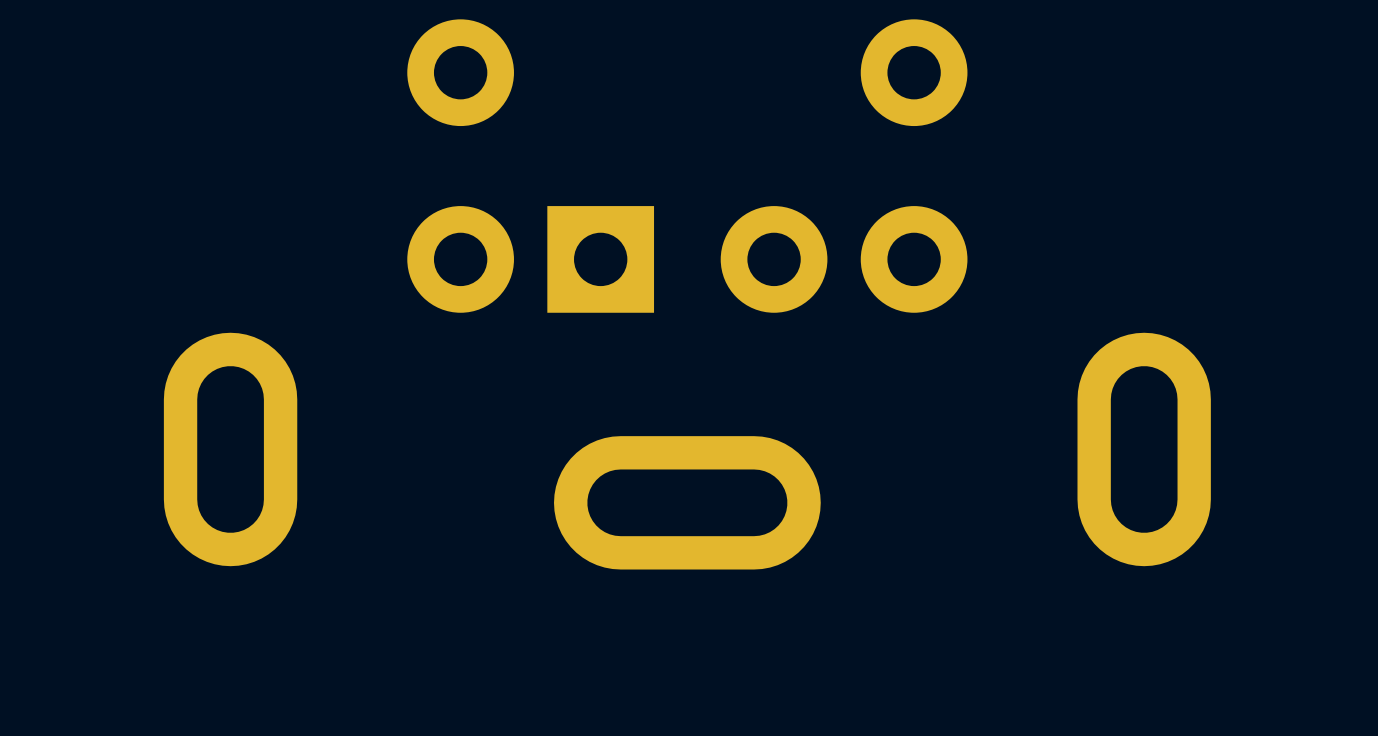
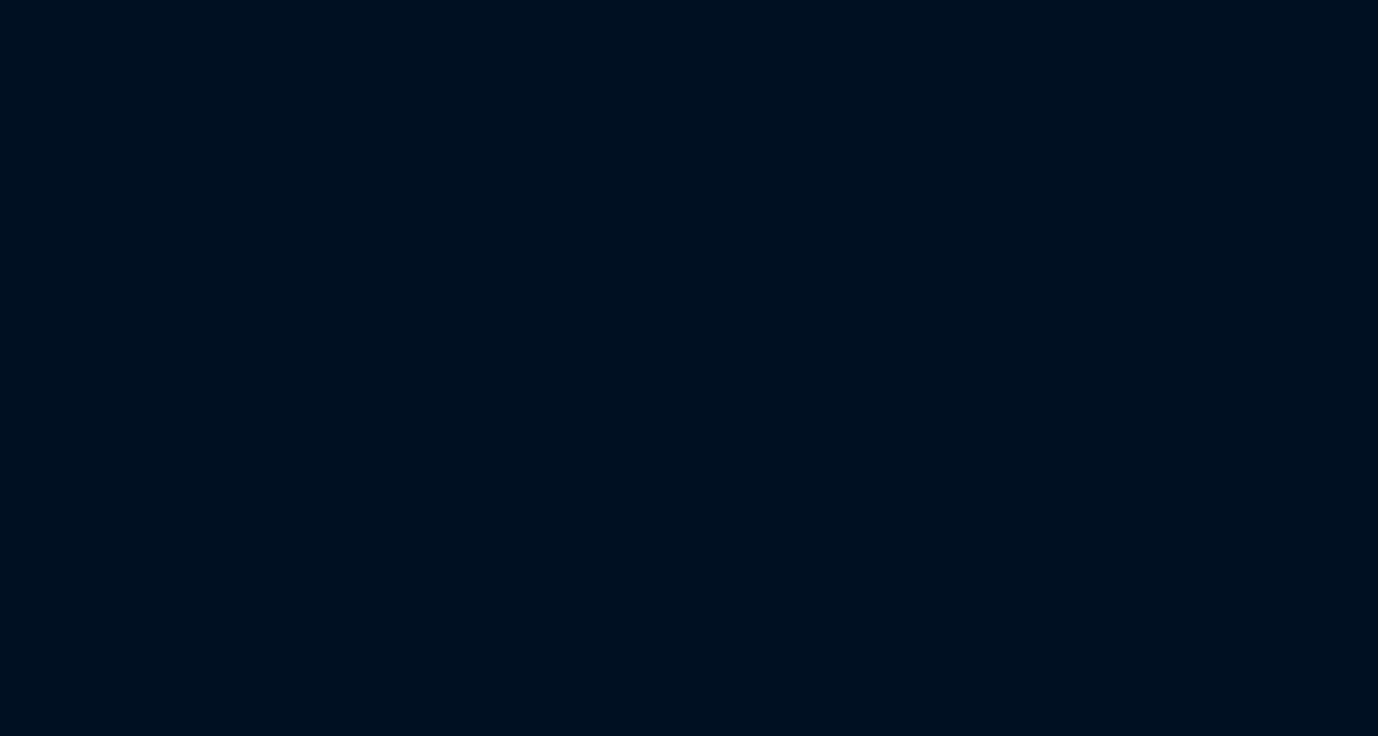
part: (687, 294) -> none

